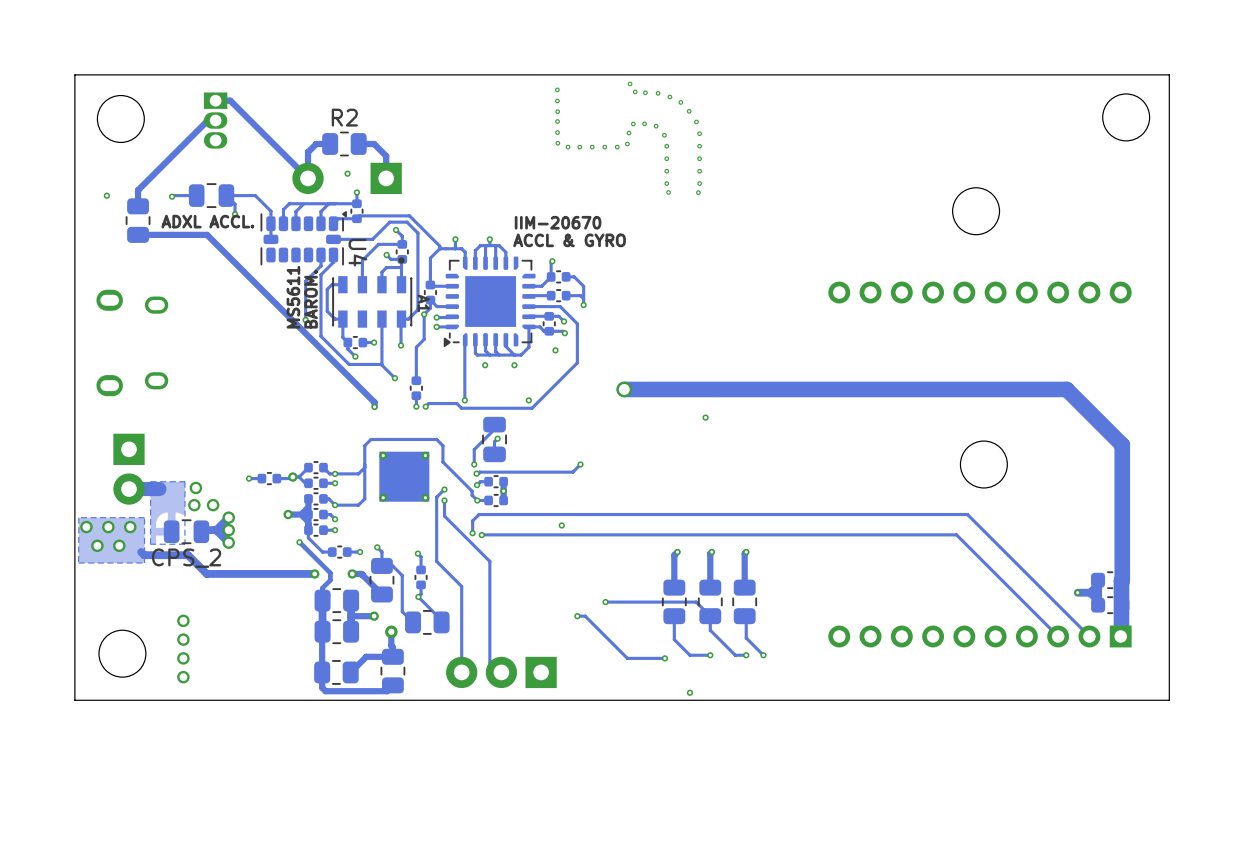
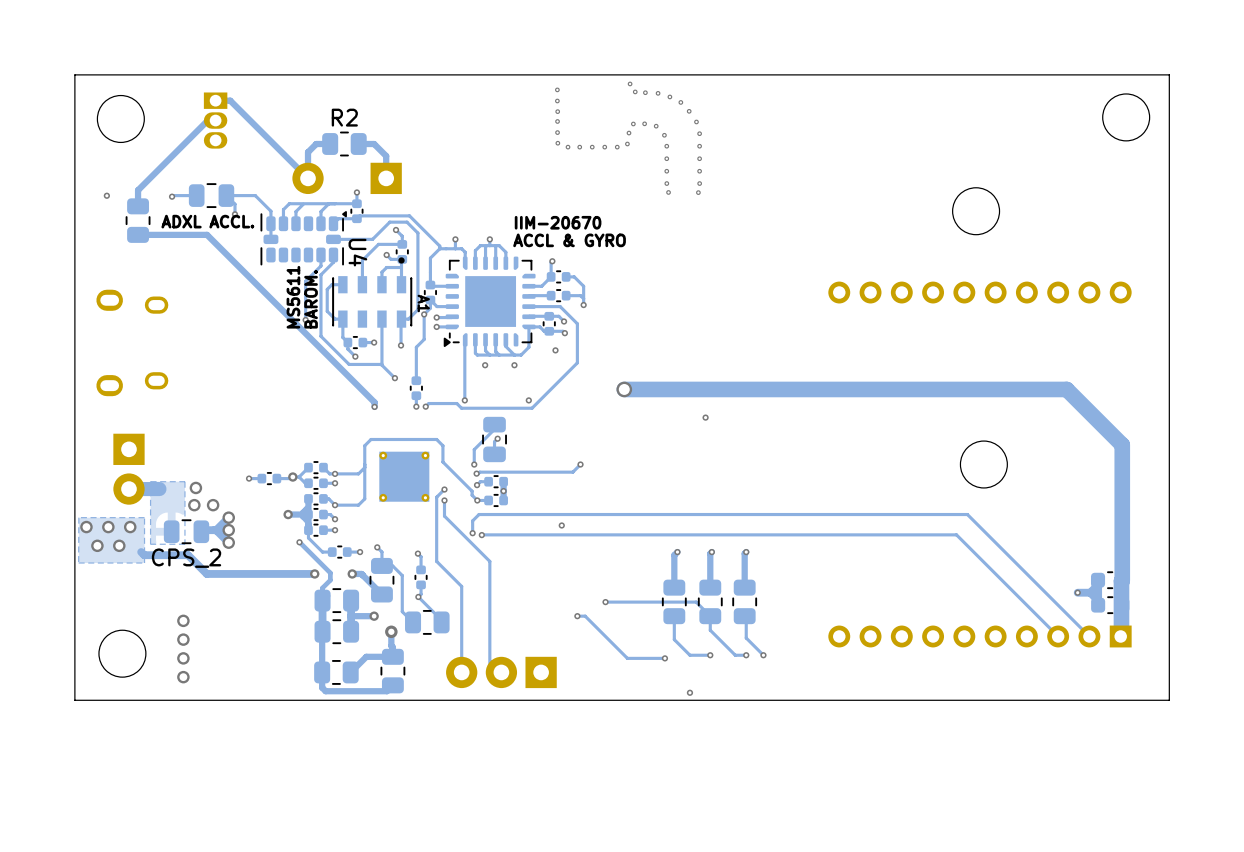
via: (347, 173) -> none

